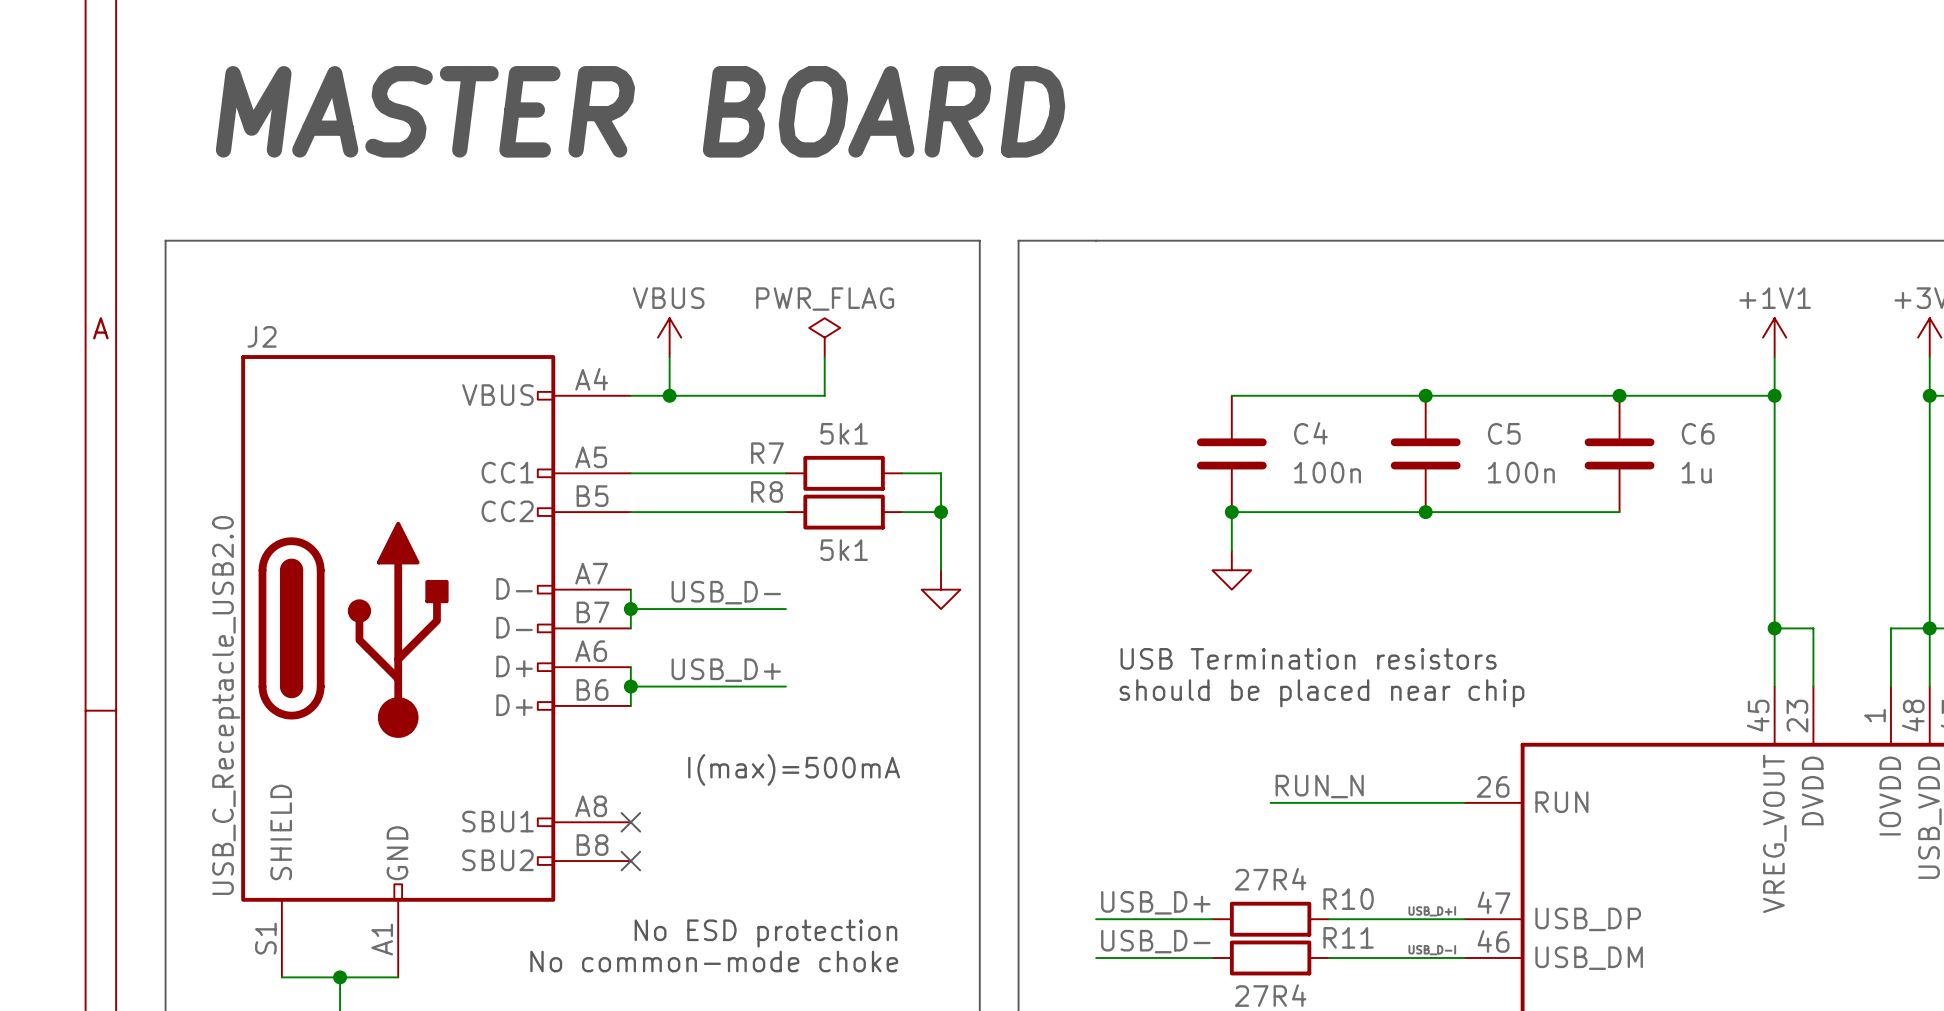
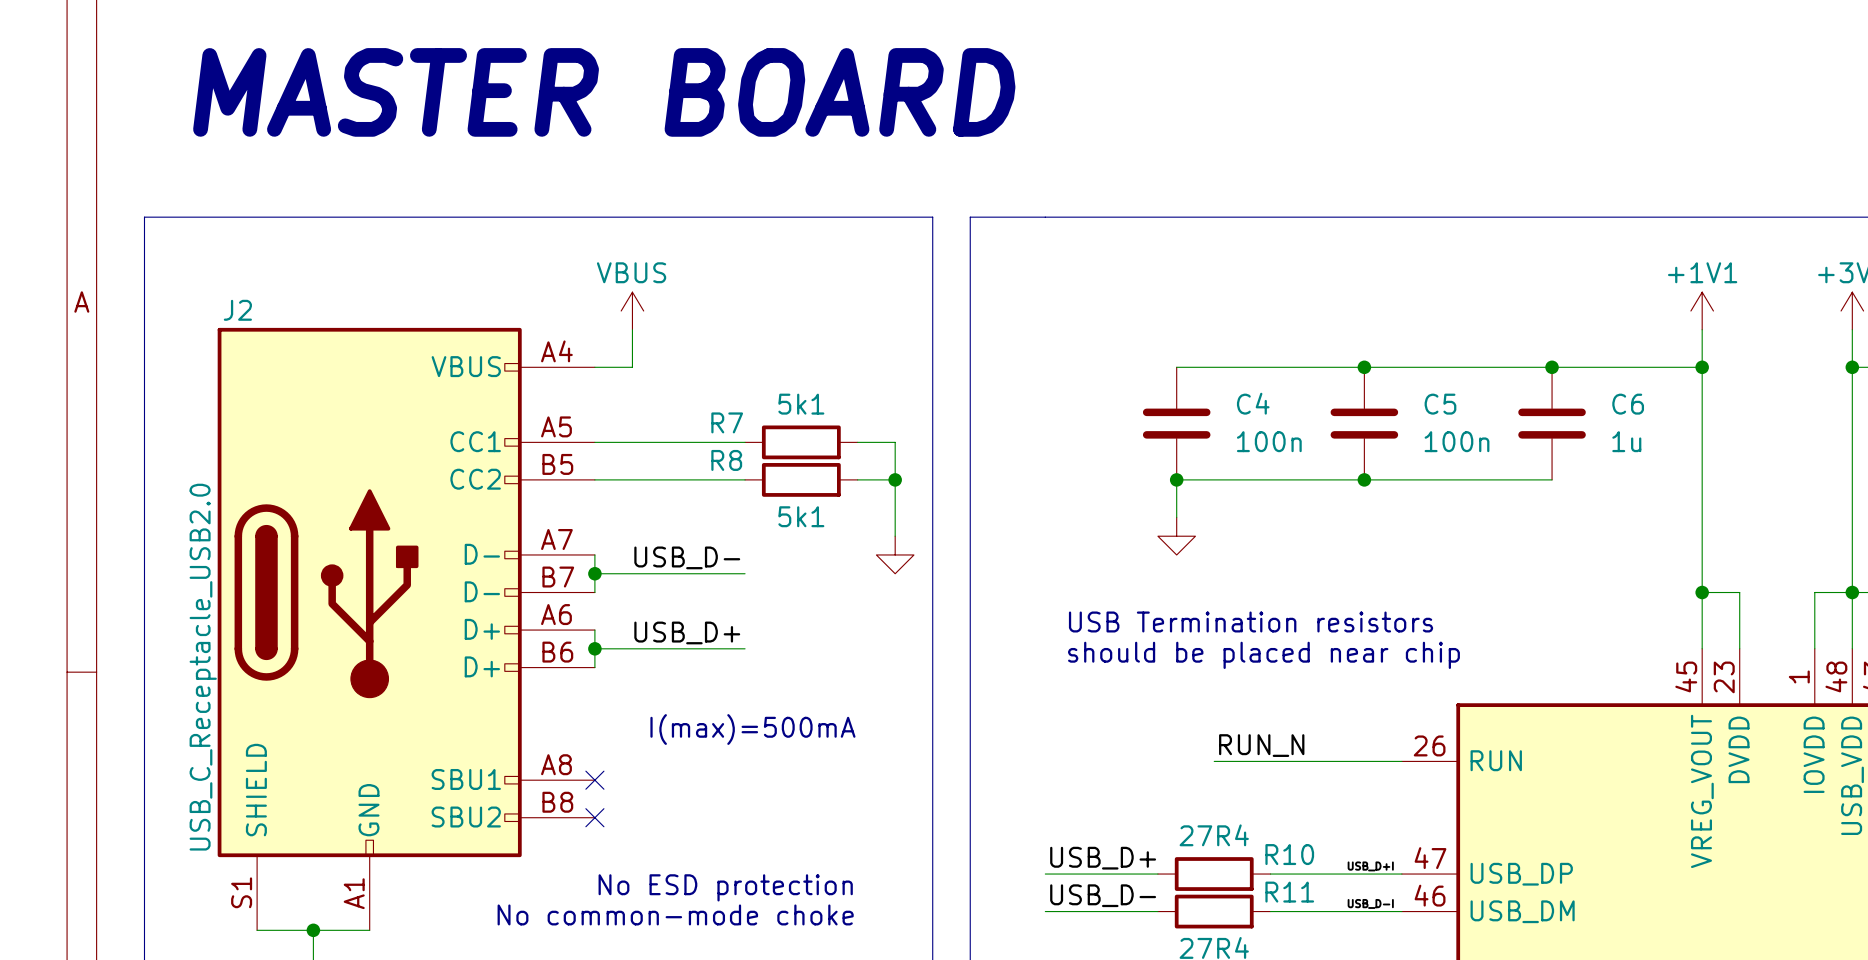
power symbol: PWR_FLAG (824, 337) -> none
wire: (824, 357) (824, 395) (669, 395) -> none
junction: (669, 395) -> none

